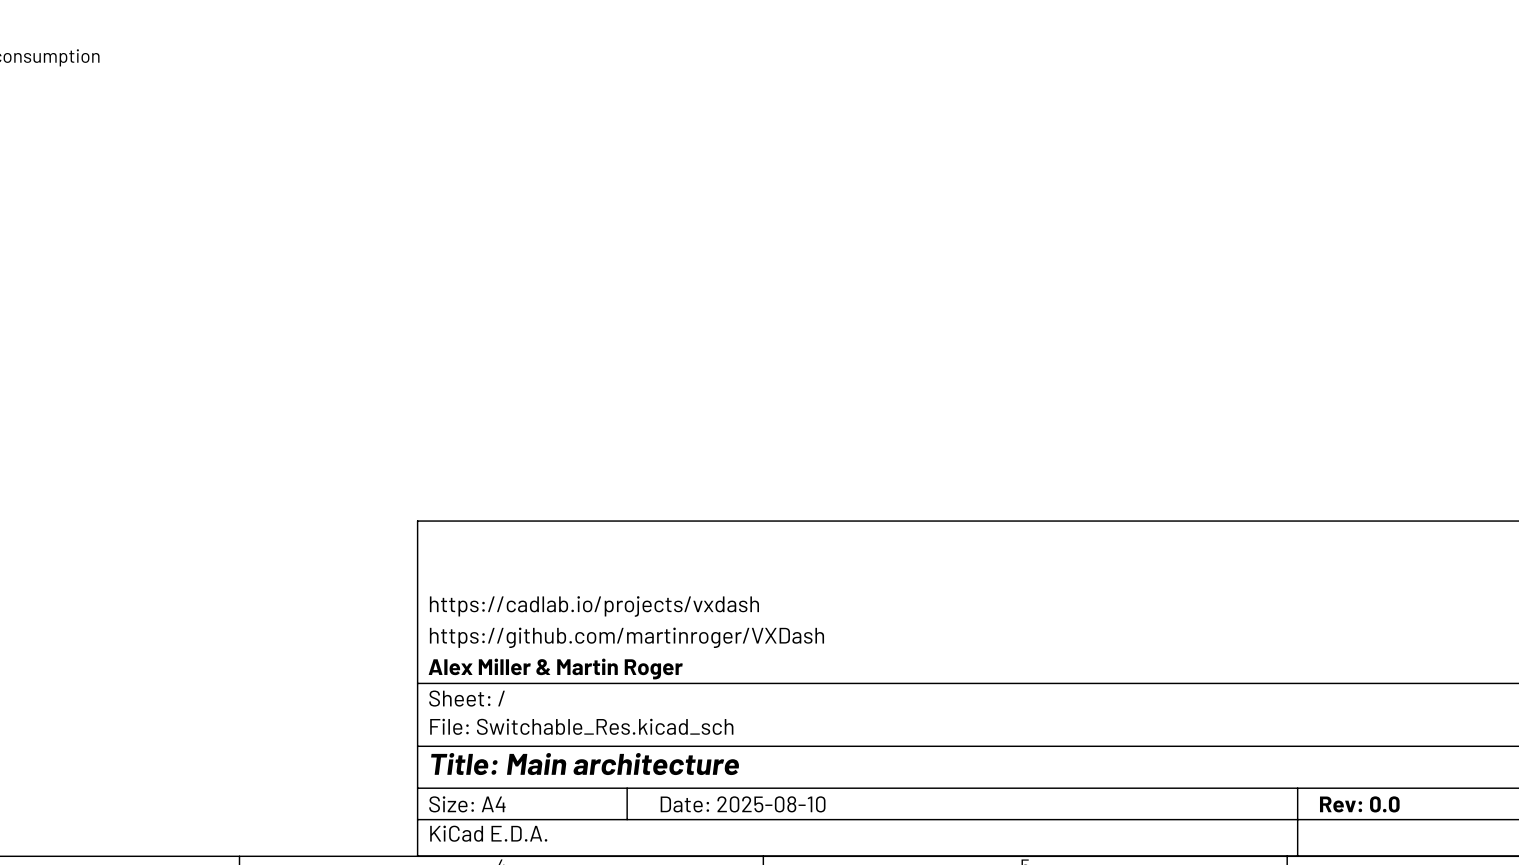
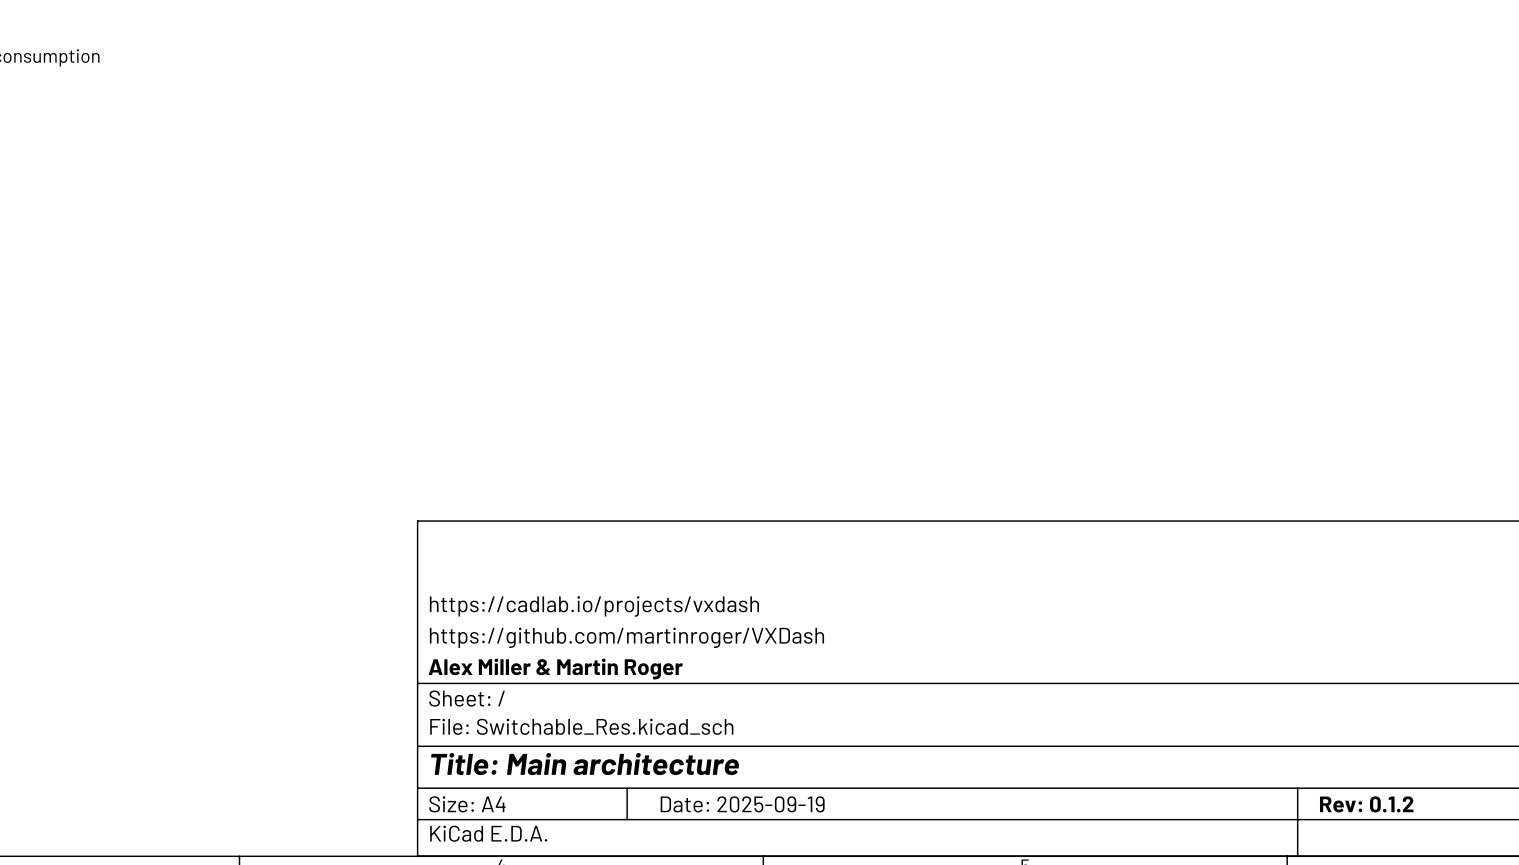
title block: Date: 2025-08-10 (743, 804) -> Date: 2025-09-19 (742, 804)
title block: Rev: 0.0 (1359, 804) -> Rev: 0.1.2 (1366, 804)

